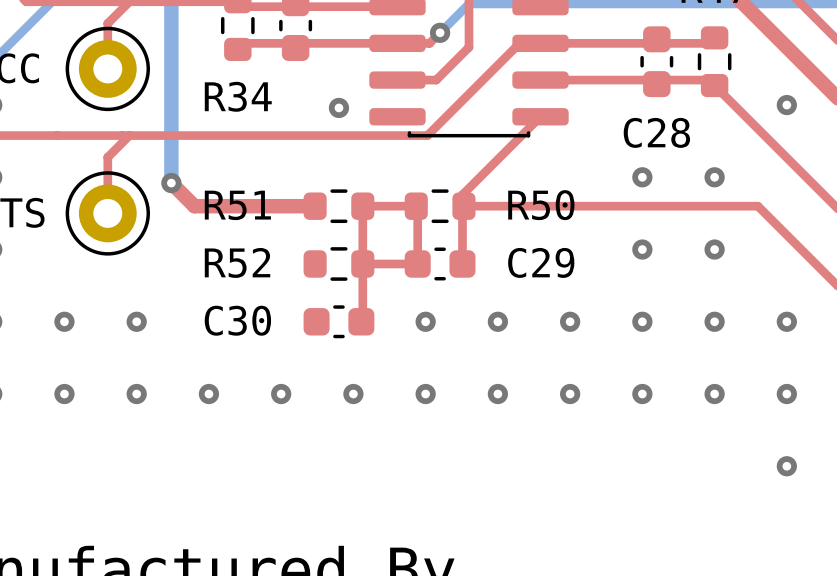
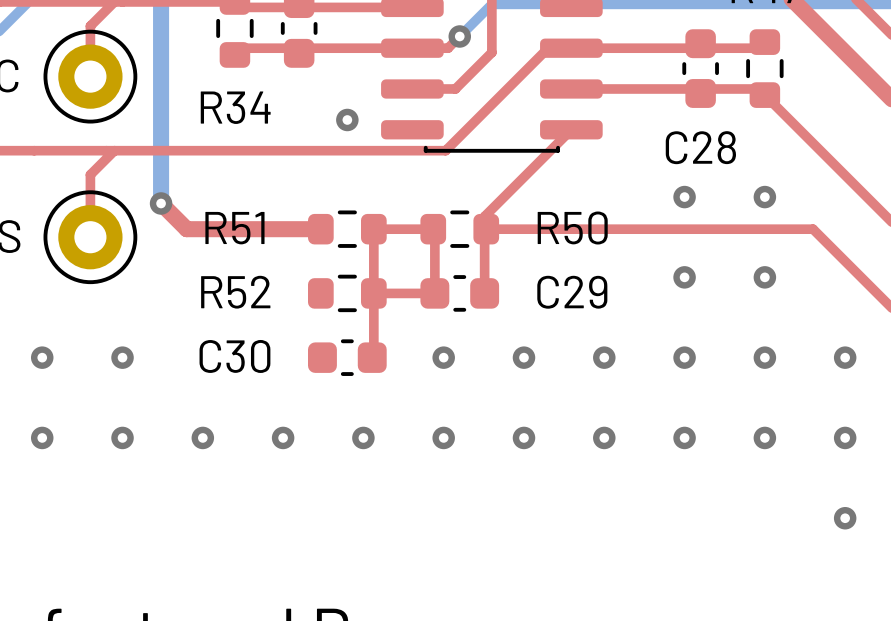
via: (786, 105) -> none

